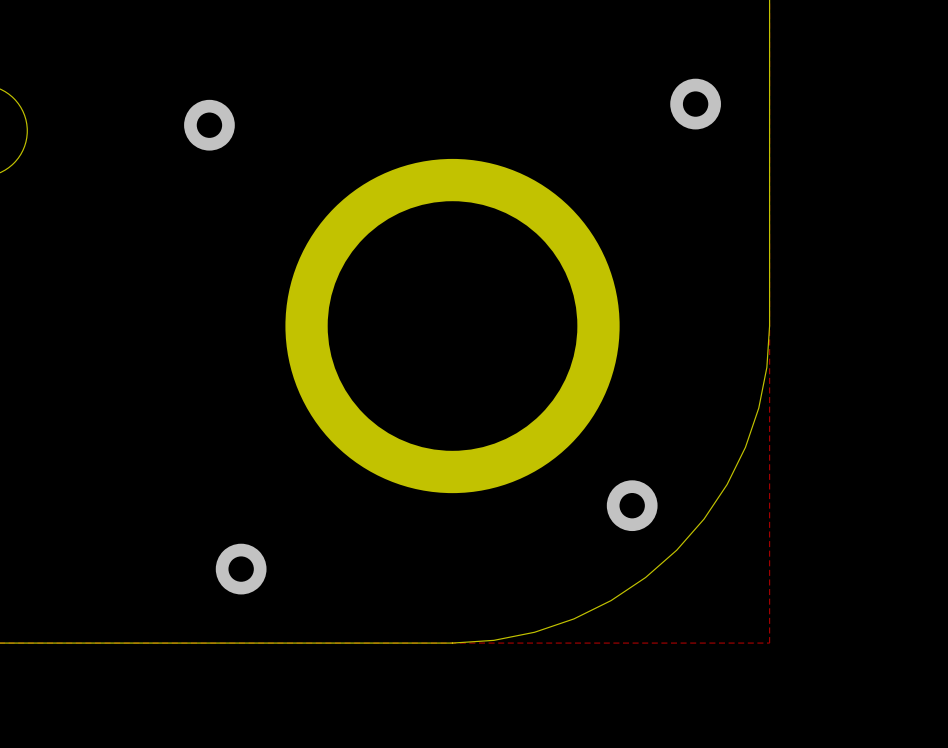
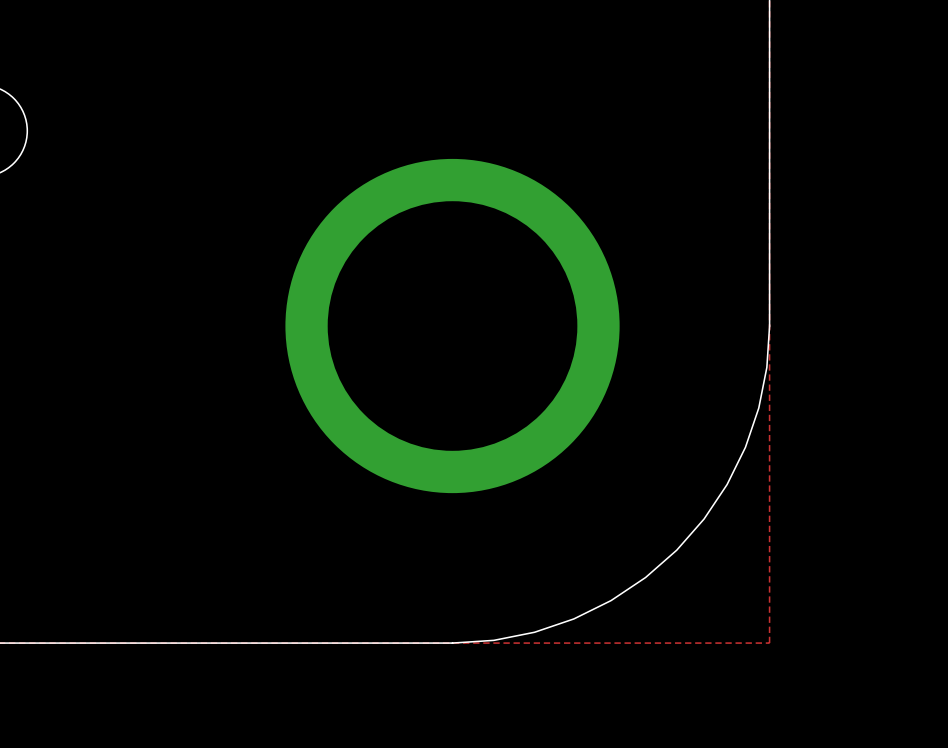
via: (695, 104) -> none
via: (209, 125) -> none
via: (632, 505) -> none
via: (241, 569) -> none

